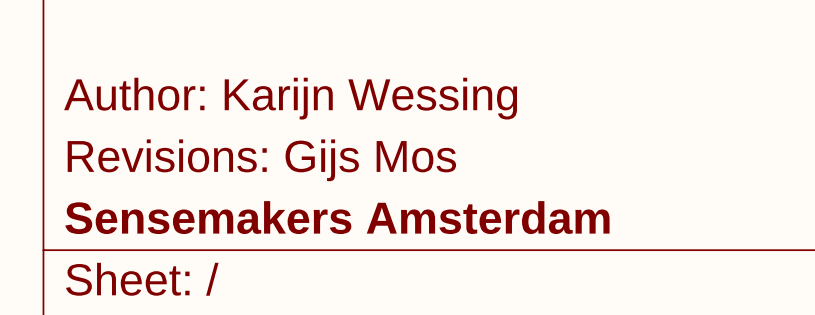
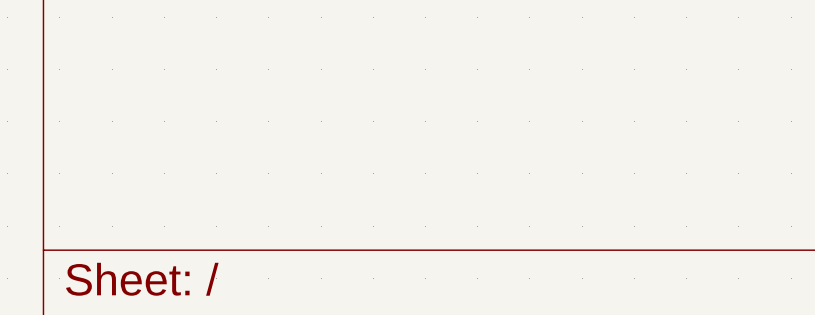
title block: Author: Karijn Wessing (290, 98) -> none
title block: Revisions: Gijs Mos (261, 160) -> none
title block: Sensemakers Amsterdam (337, 217) -> none

